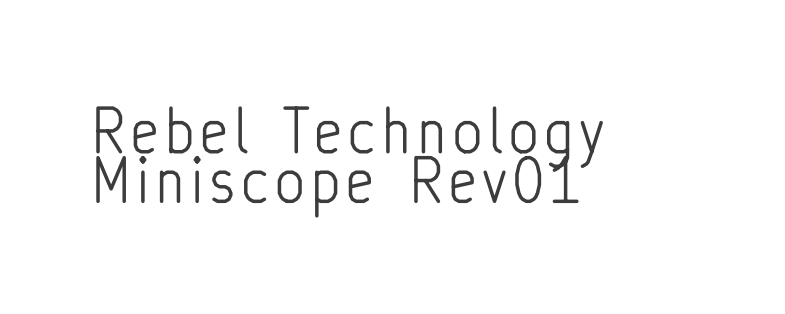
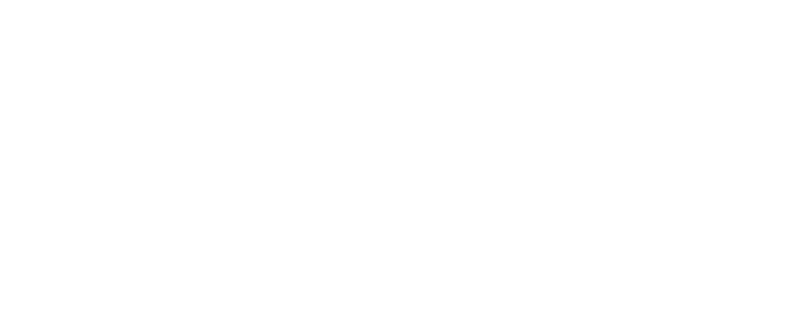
text: Rebel Technology (349, 137) -> none
text: Miniscope Rev01 (337, 186) -> none

